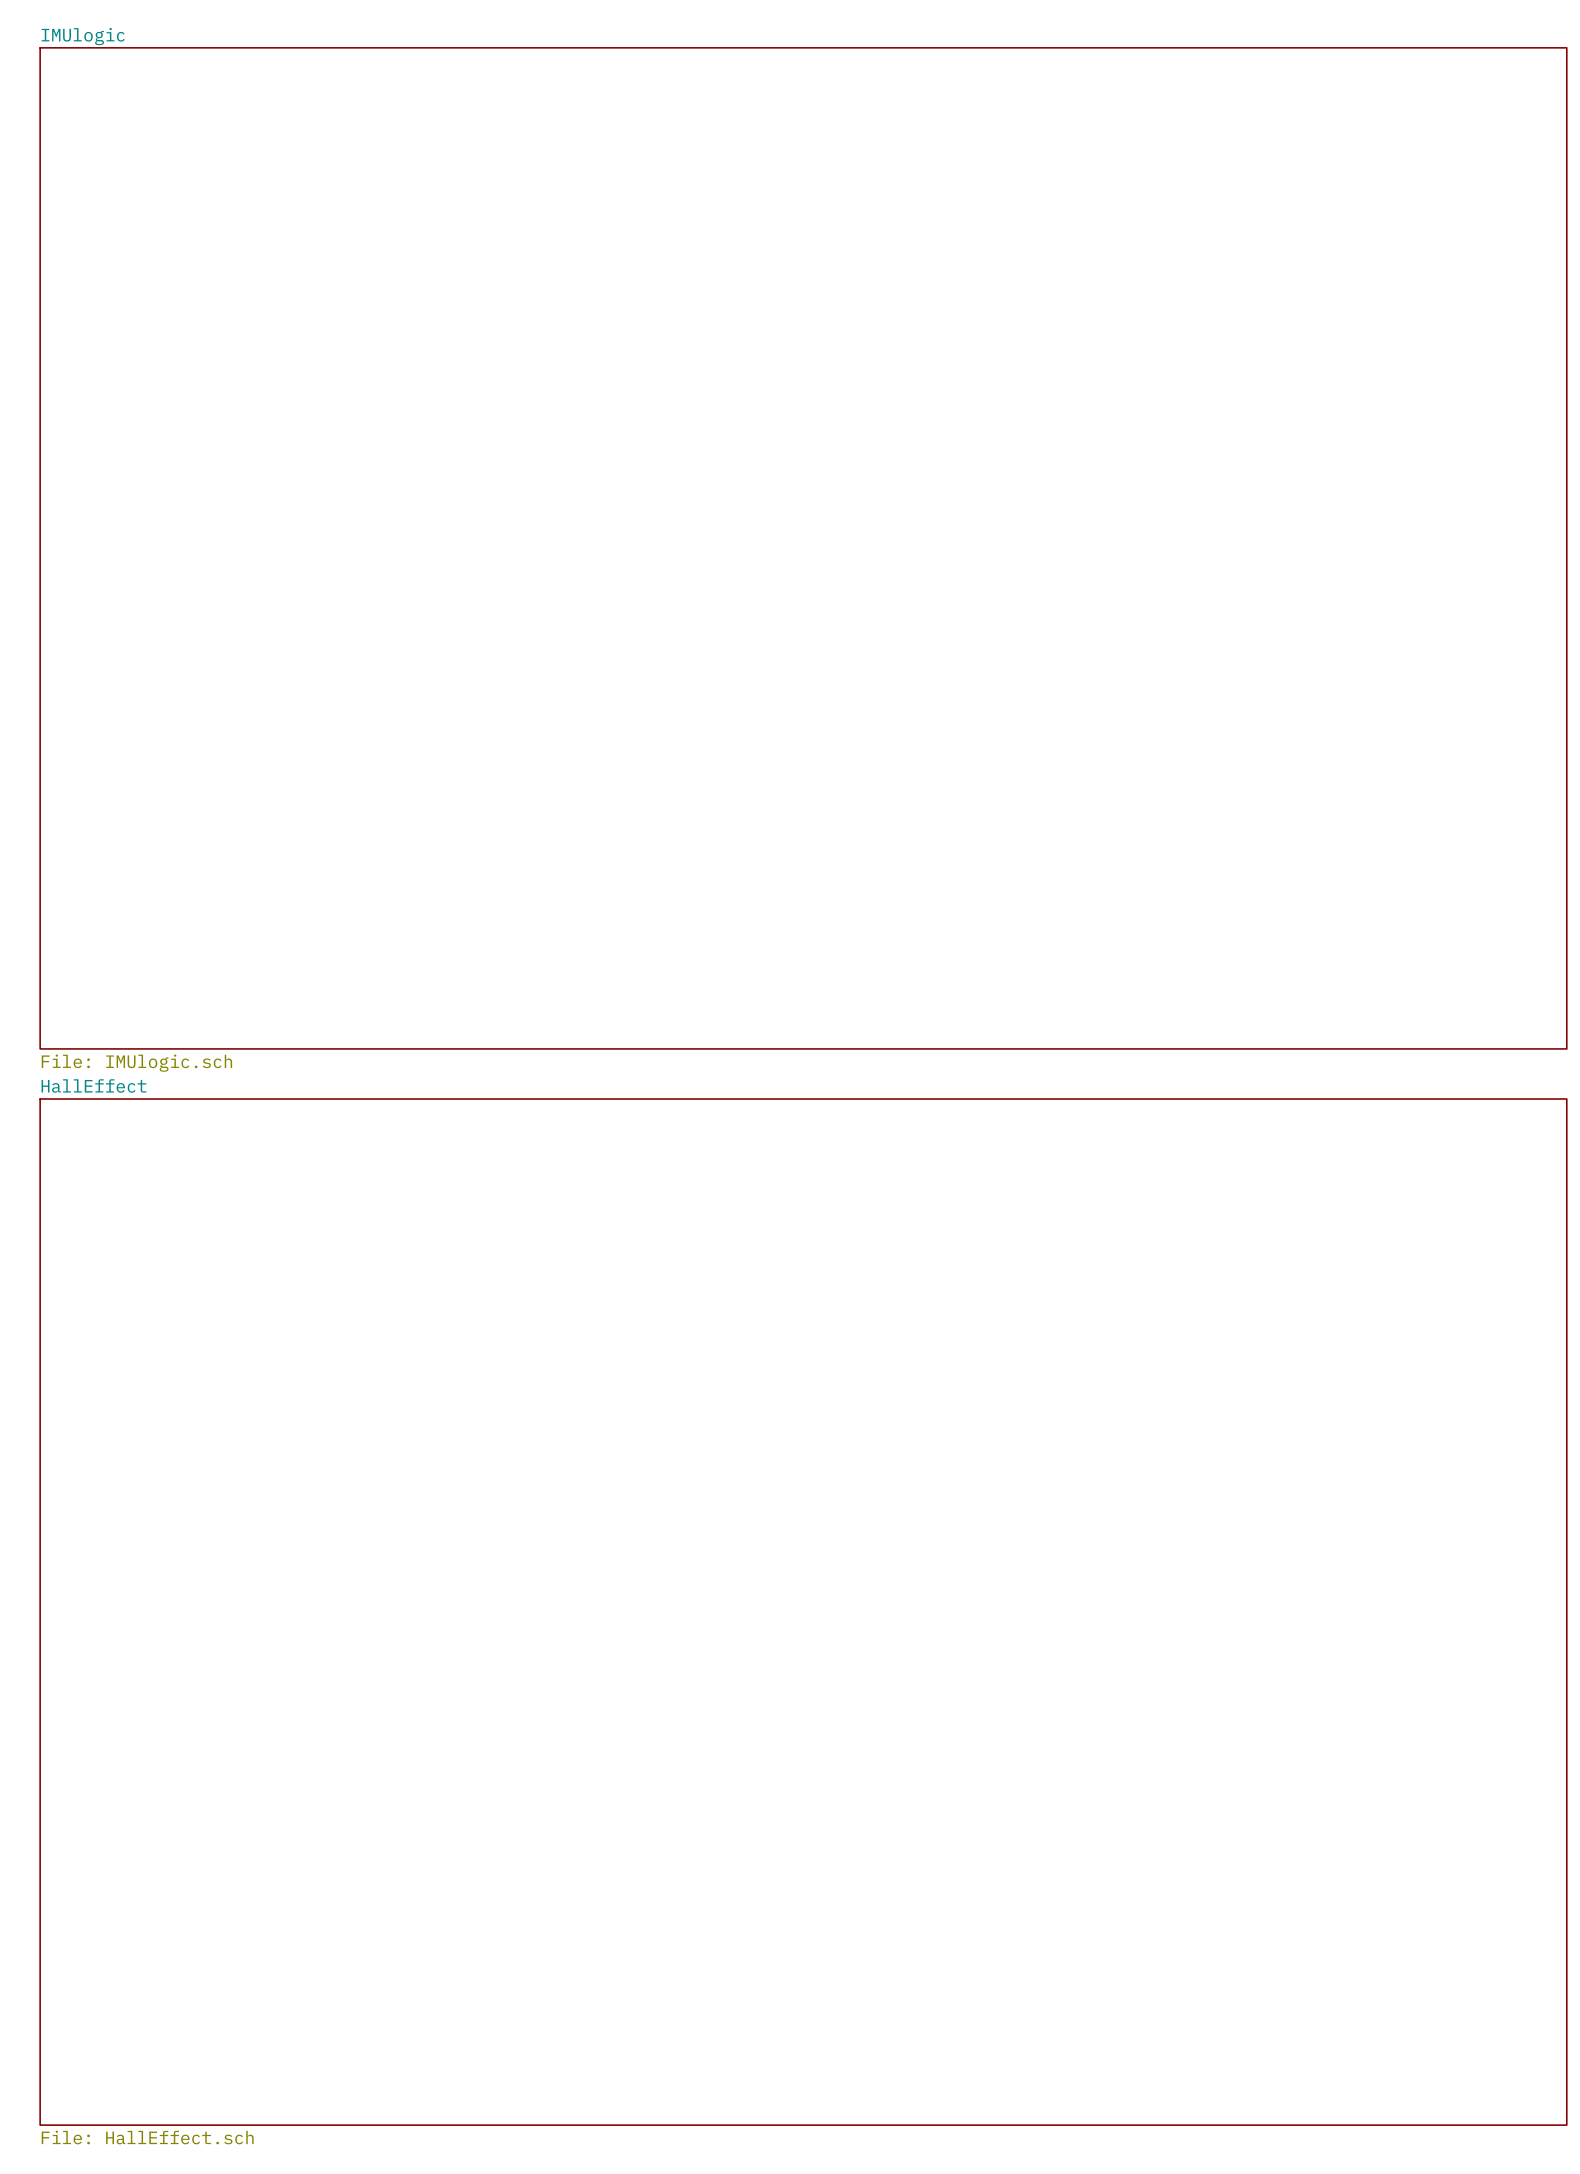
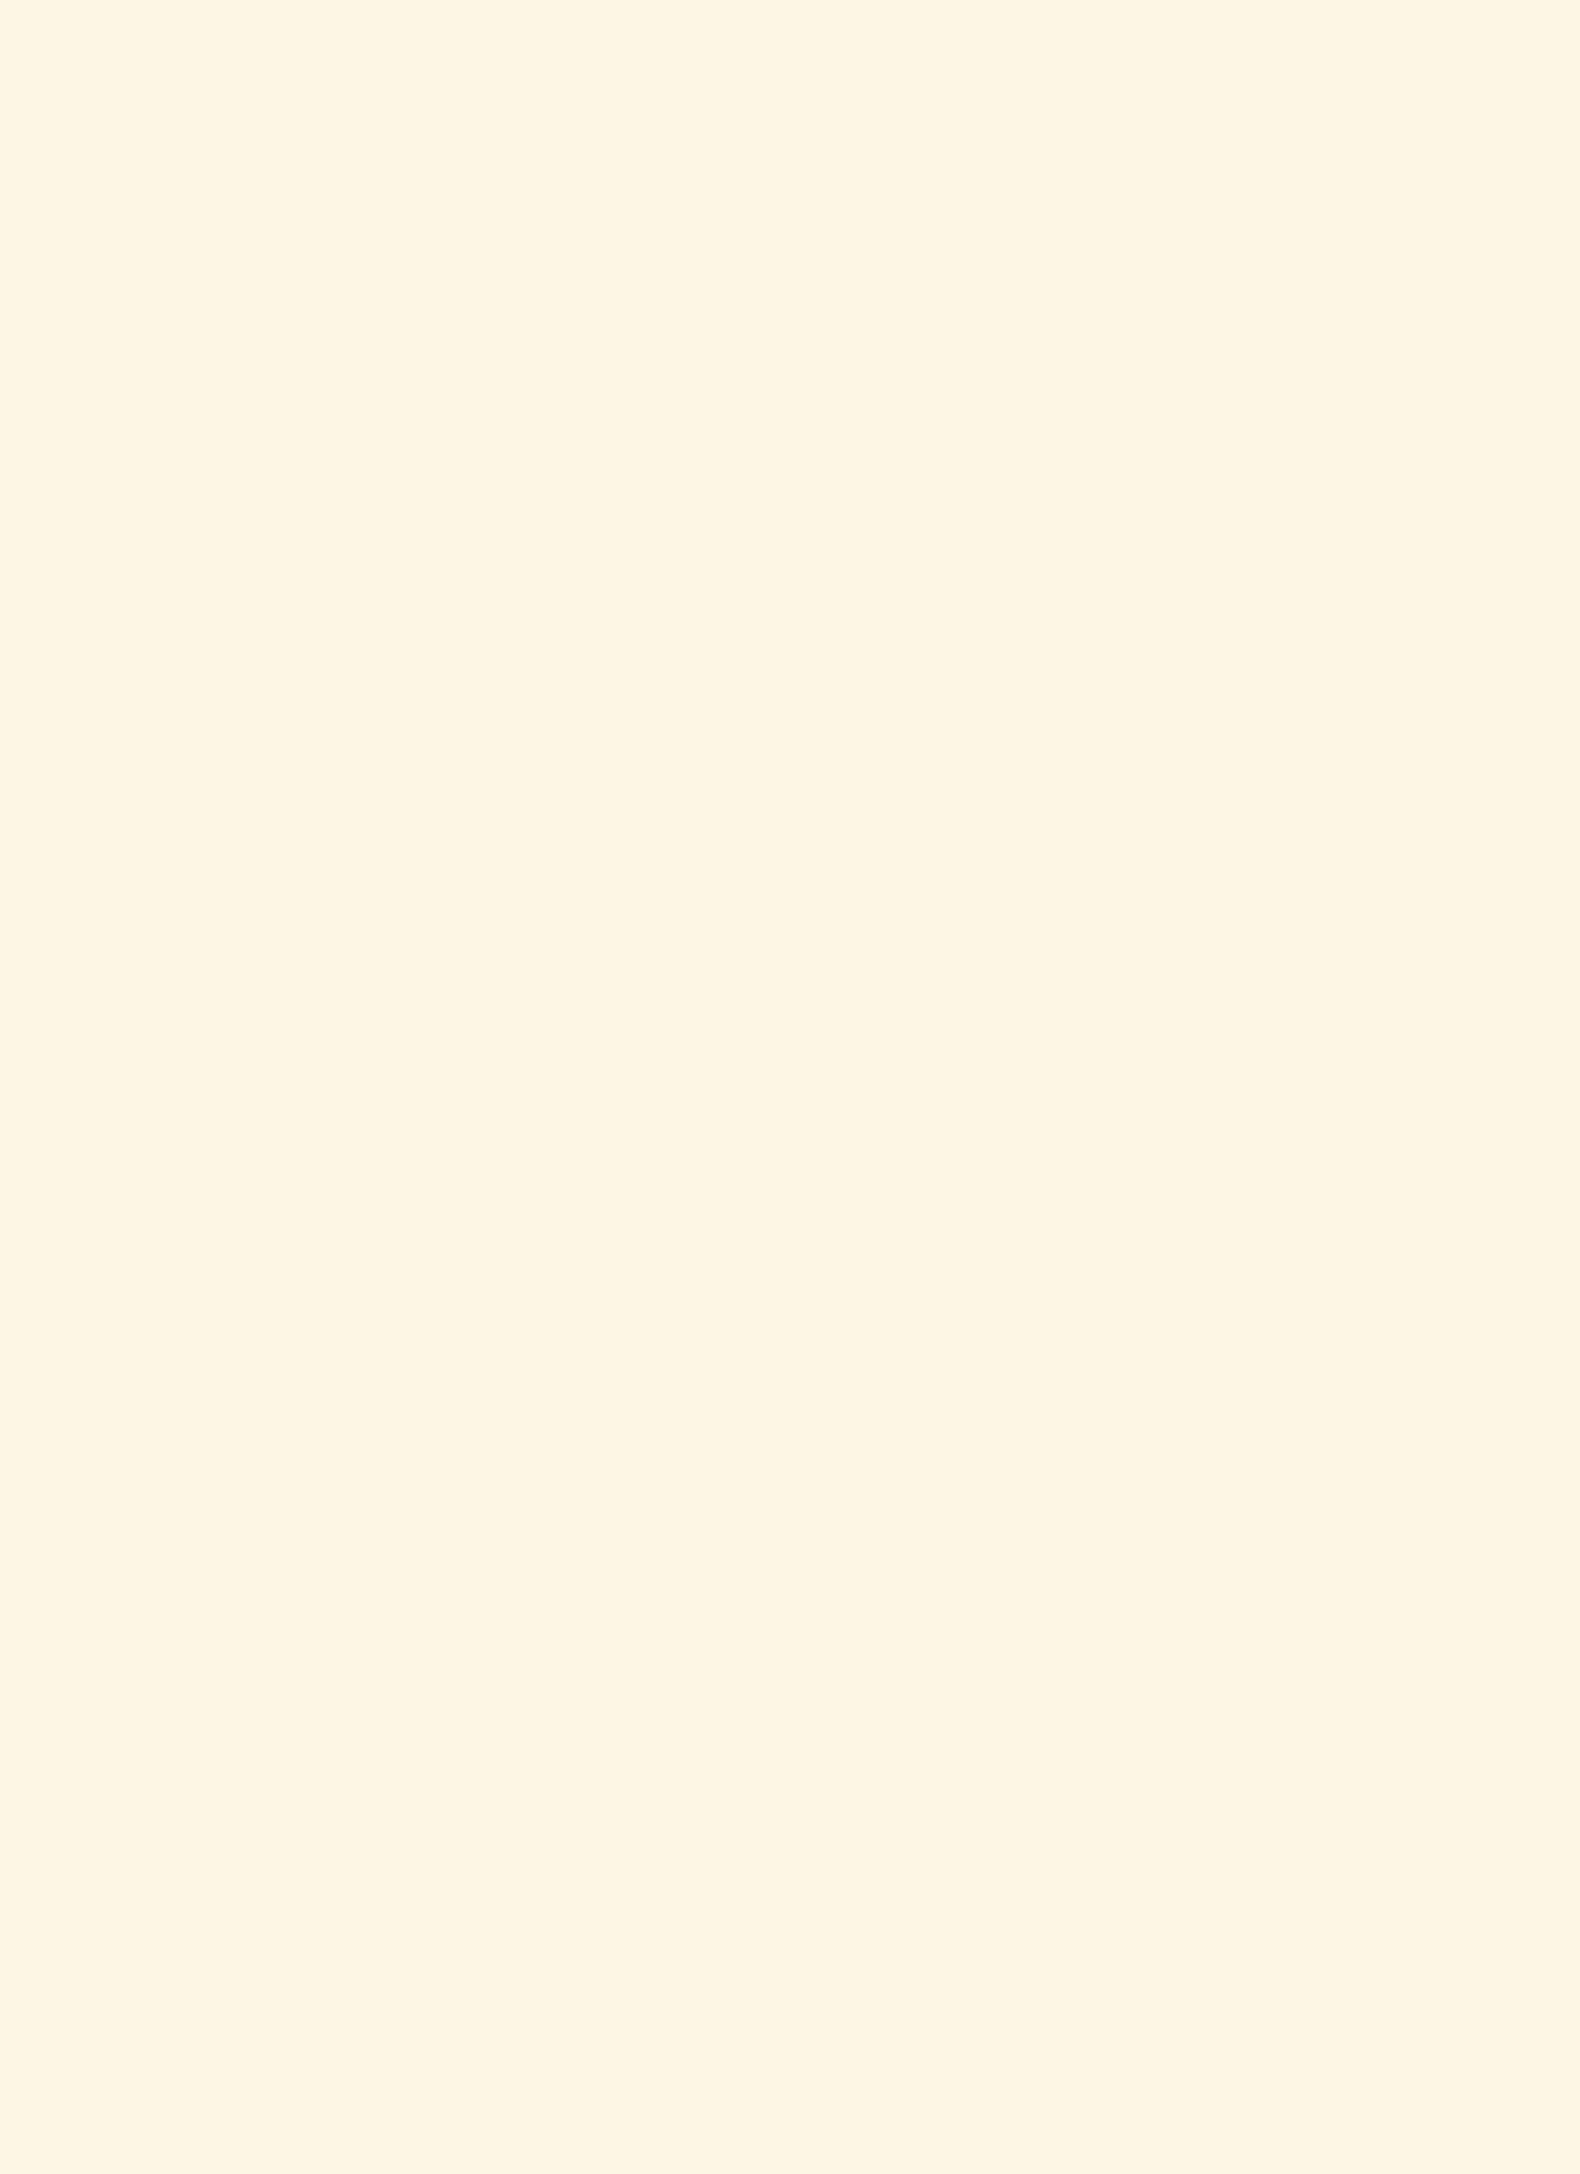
sheet IMUlogic: File: IMUlogic.sch (803, 548) -> none
sheet HallEffect: File: HallEffect.sch (803, 1612) -> none

